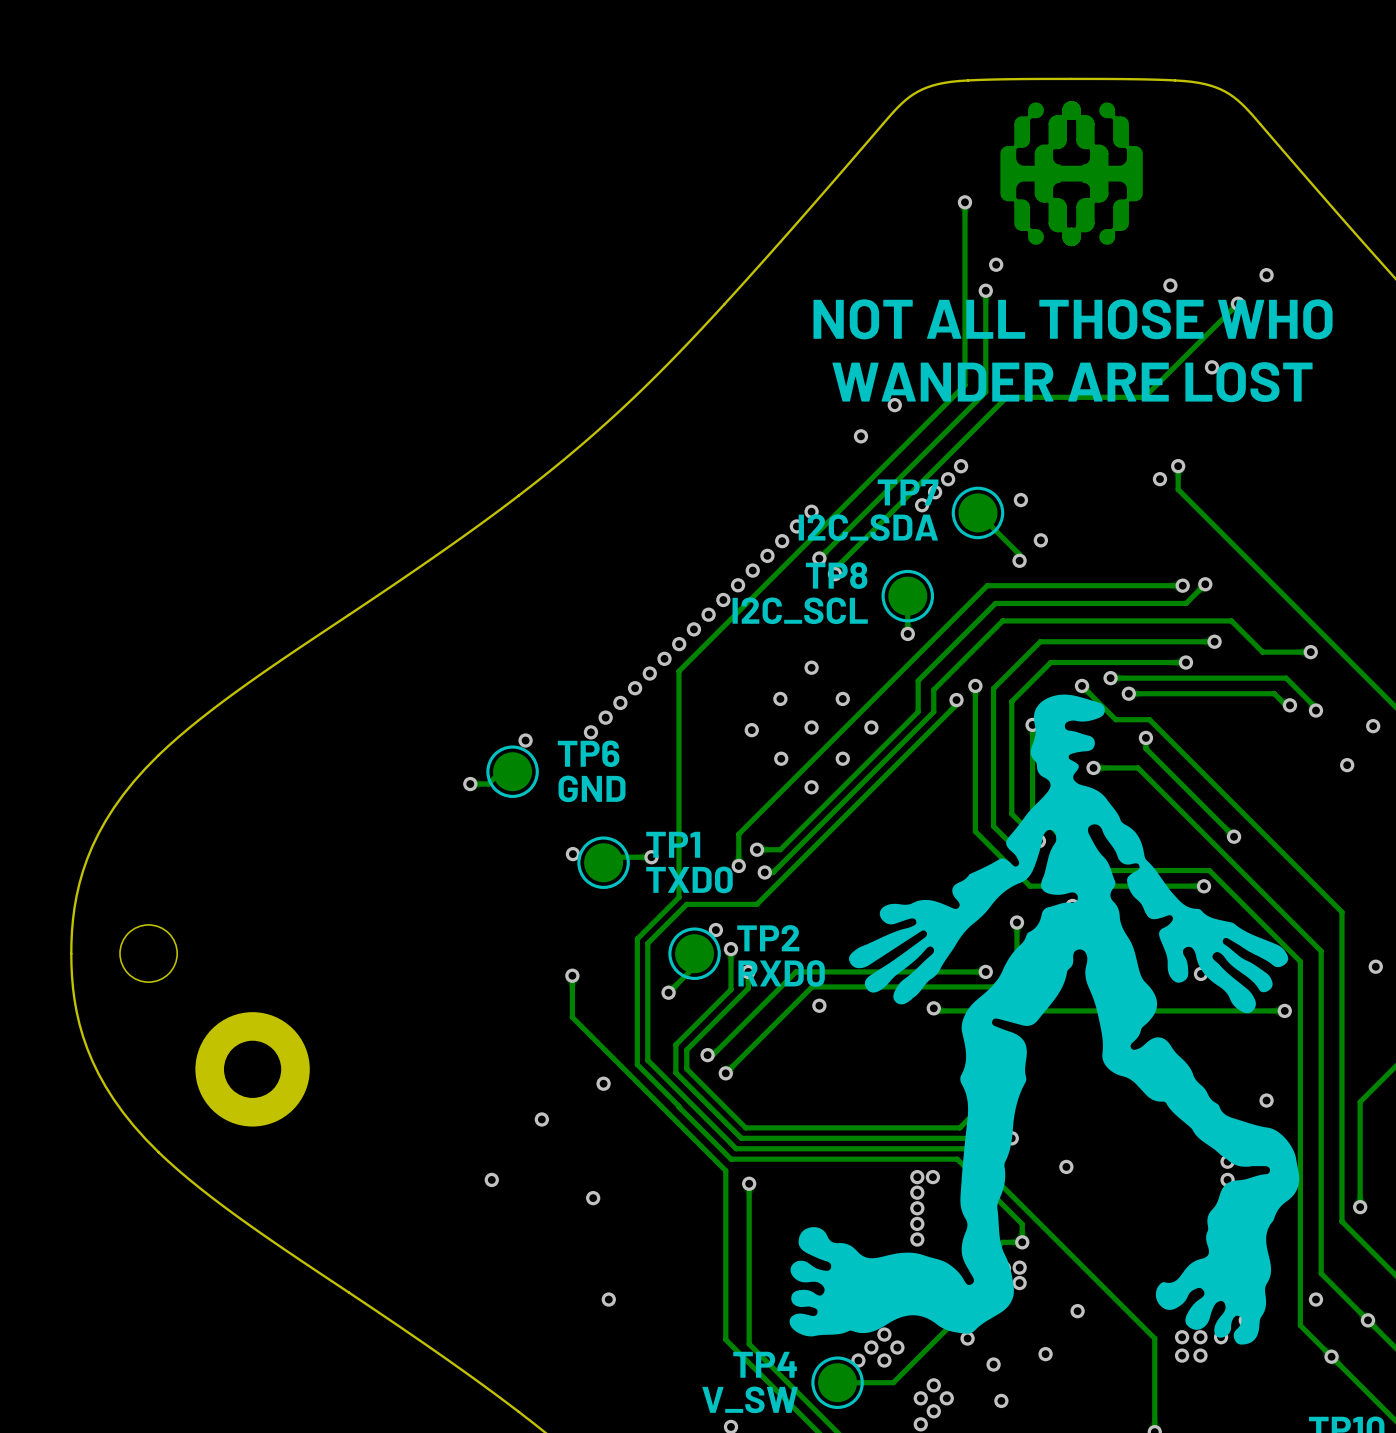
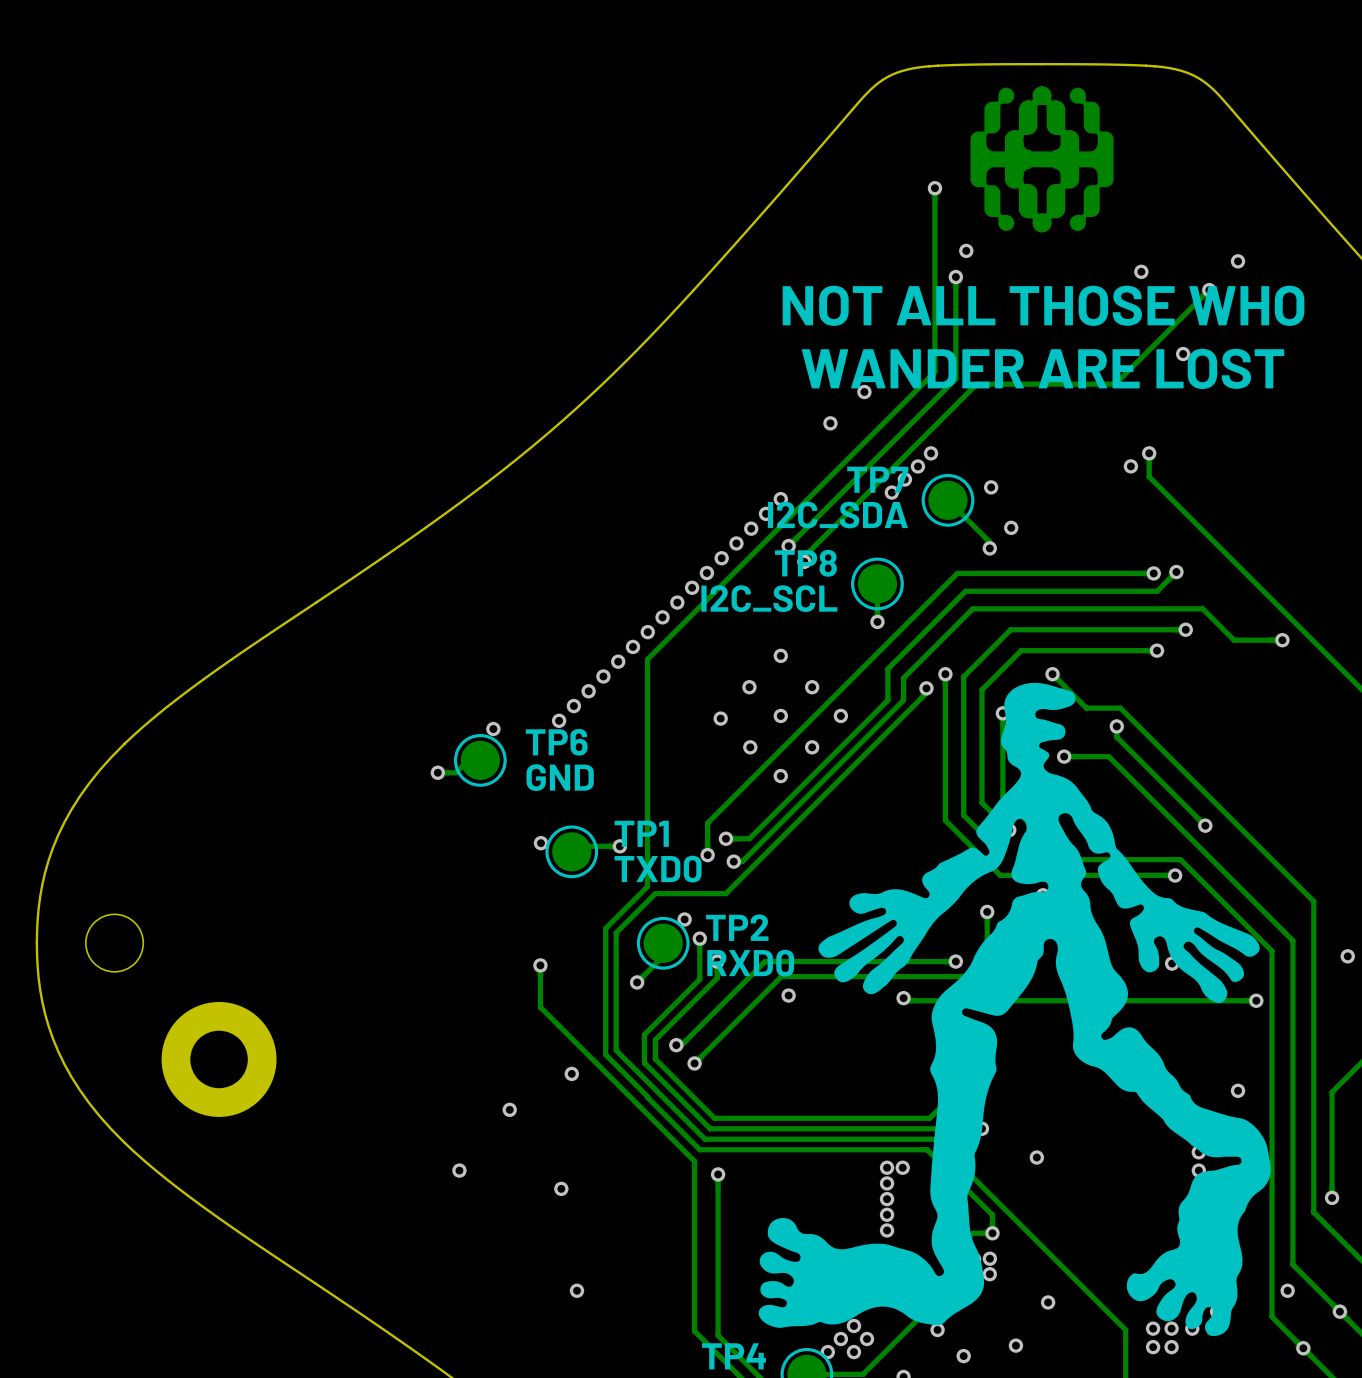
track: (1110, 678) (1286, 678) (1315, 707) (1315, 710) -> none
via: (1110, 678) -> none
track: (1128, 693) (1274, 693) (1285, 705) (1289, 705) -> none
via: (1128, 693) -> none
via: (1289, 705) -> none
via: (1315, 710) -> none
via: (1373, 726) -> none
via: (1347, 765) -> none

